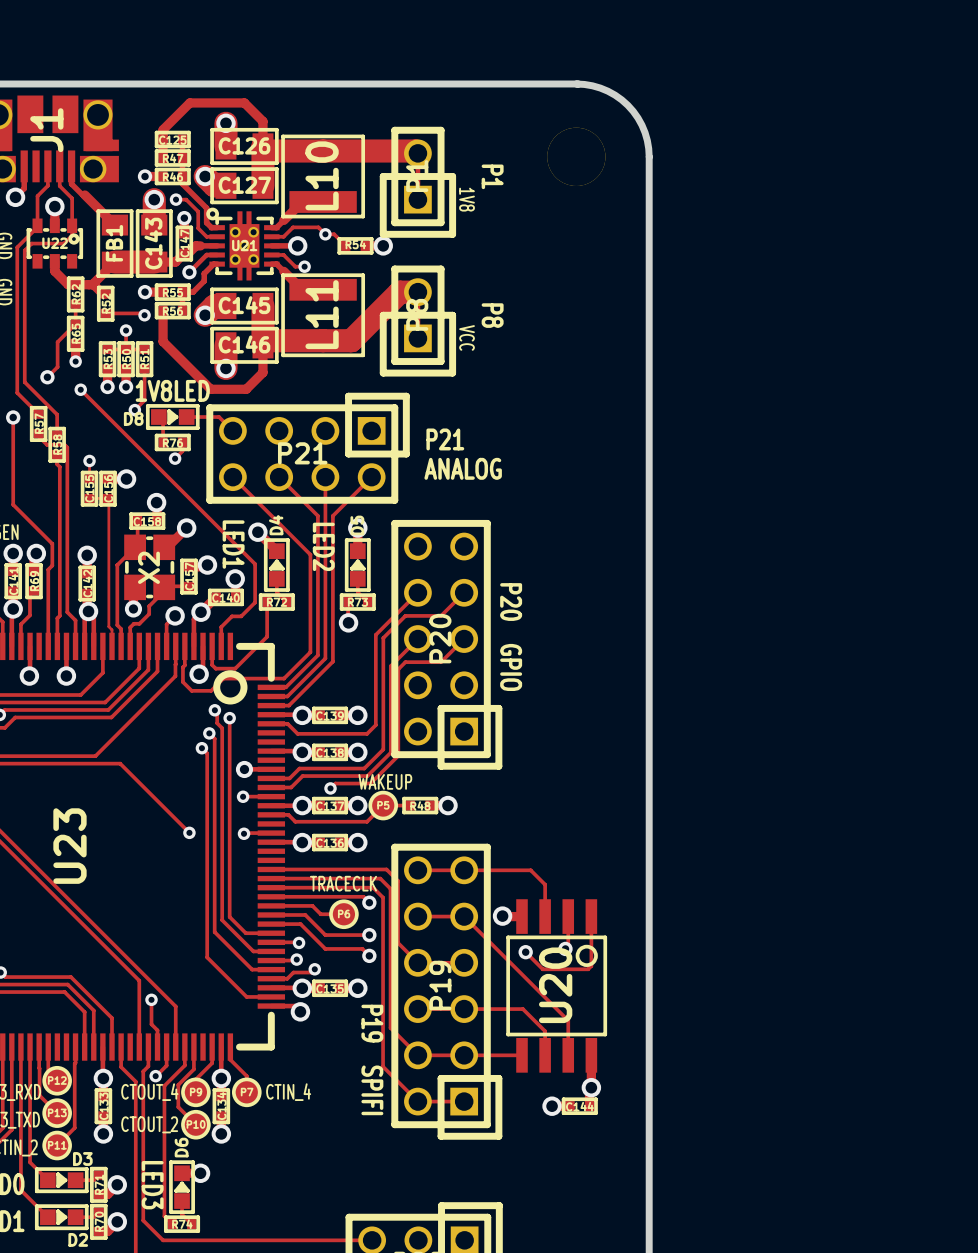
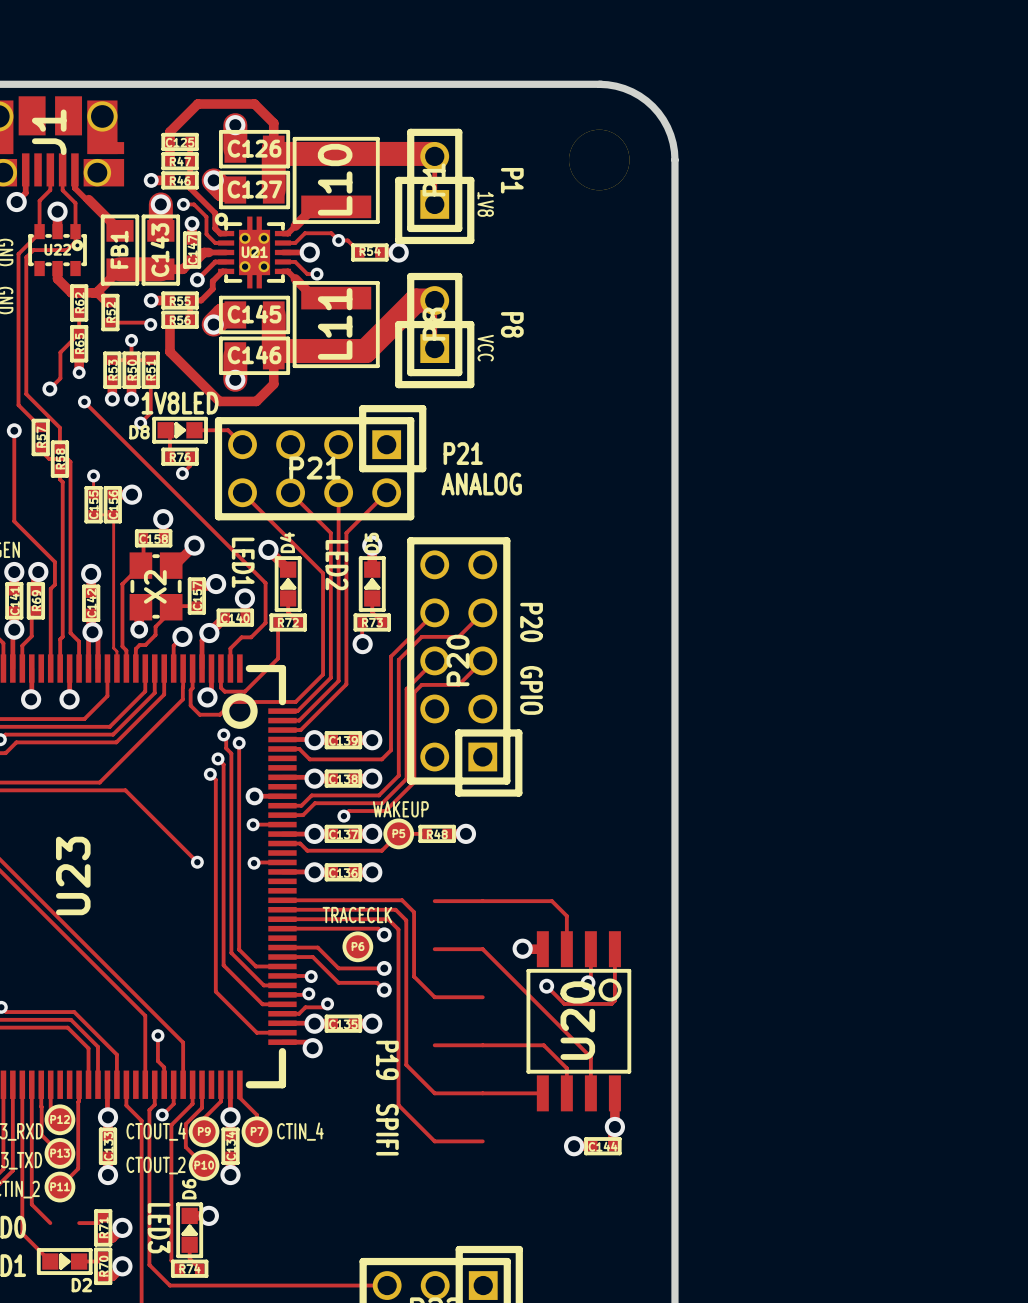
track: (271, 905) (312, 905) (320, 914) (343, 914) -> none
P19: (446, 991) -> none
D3: (61, 1180) -> none

